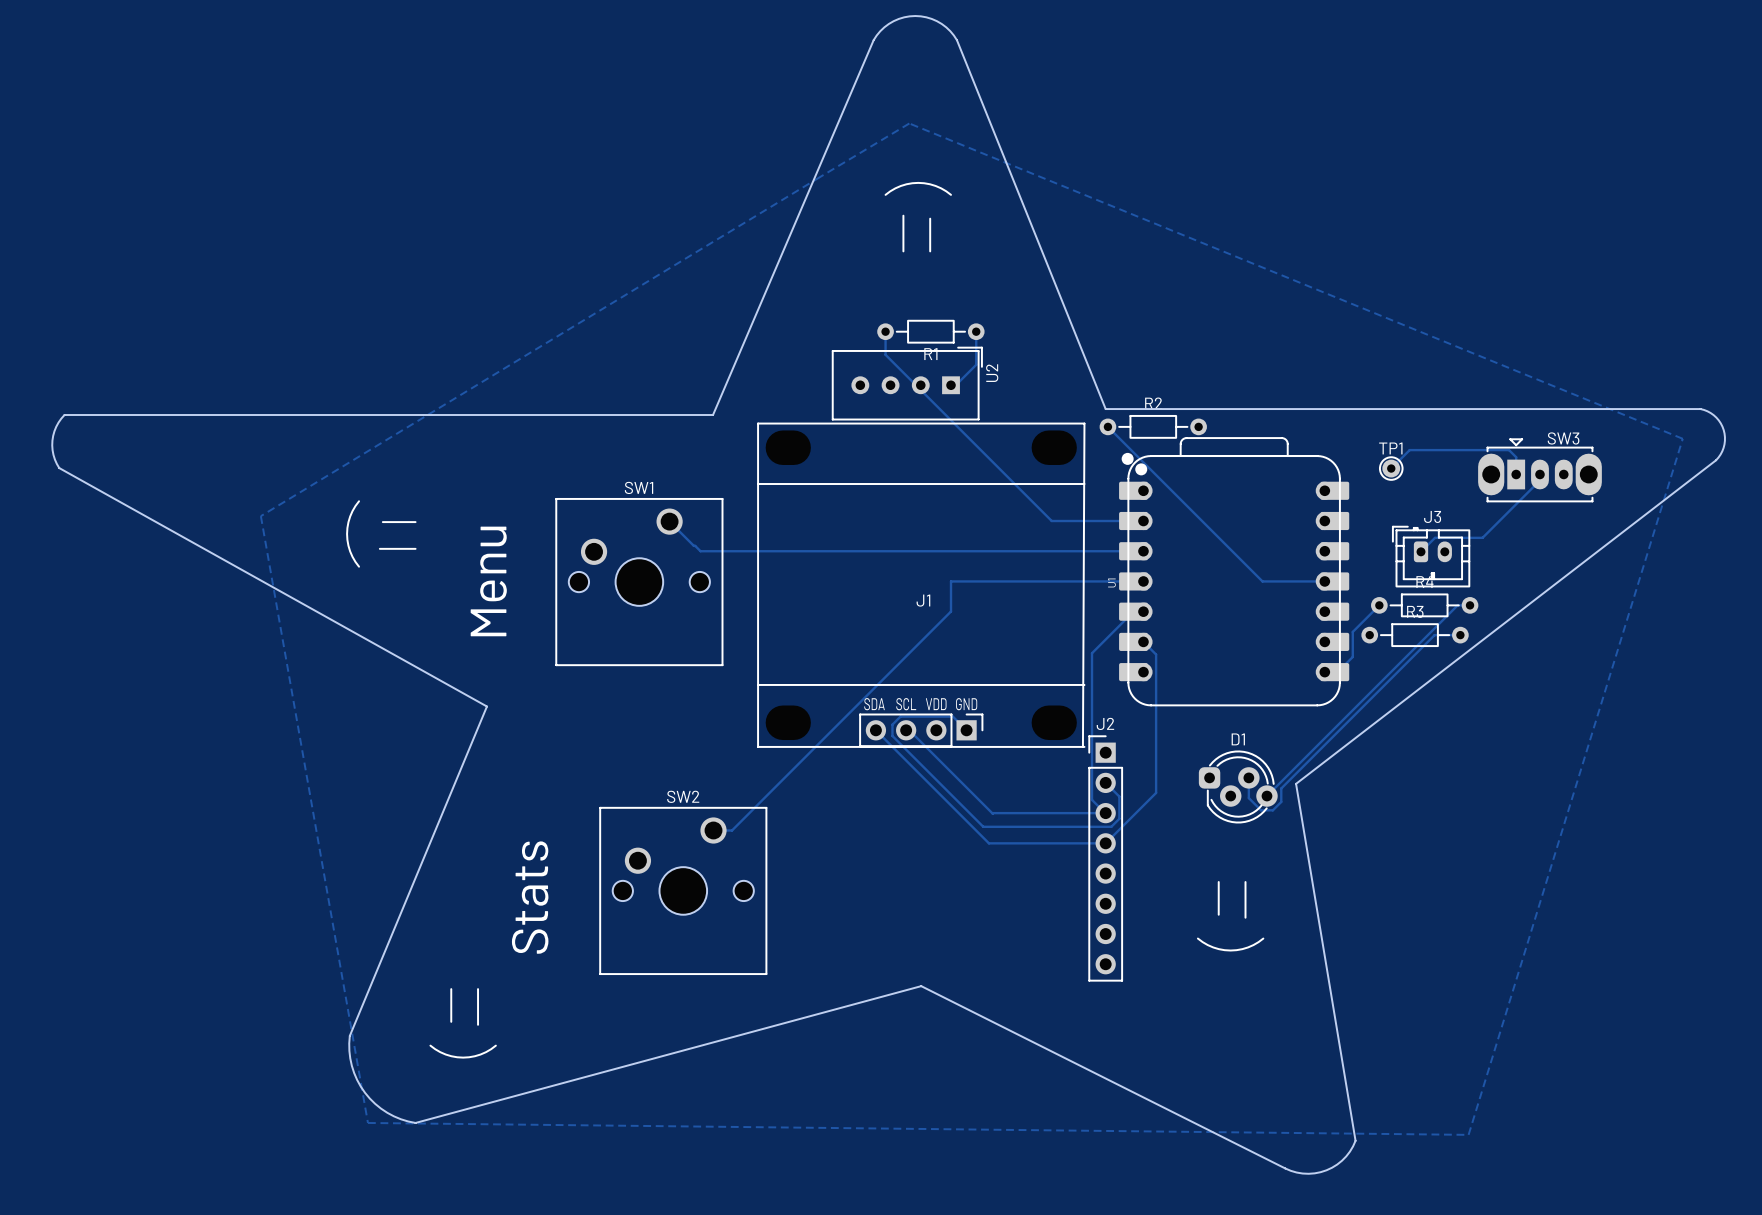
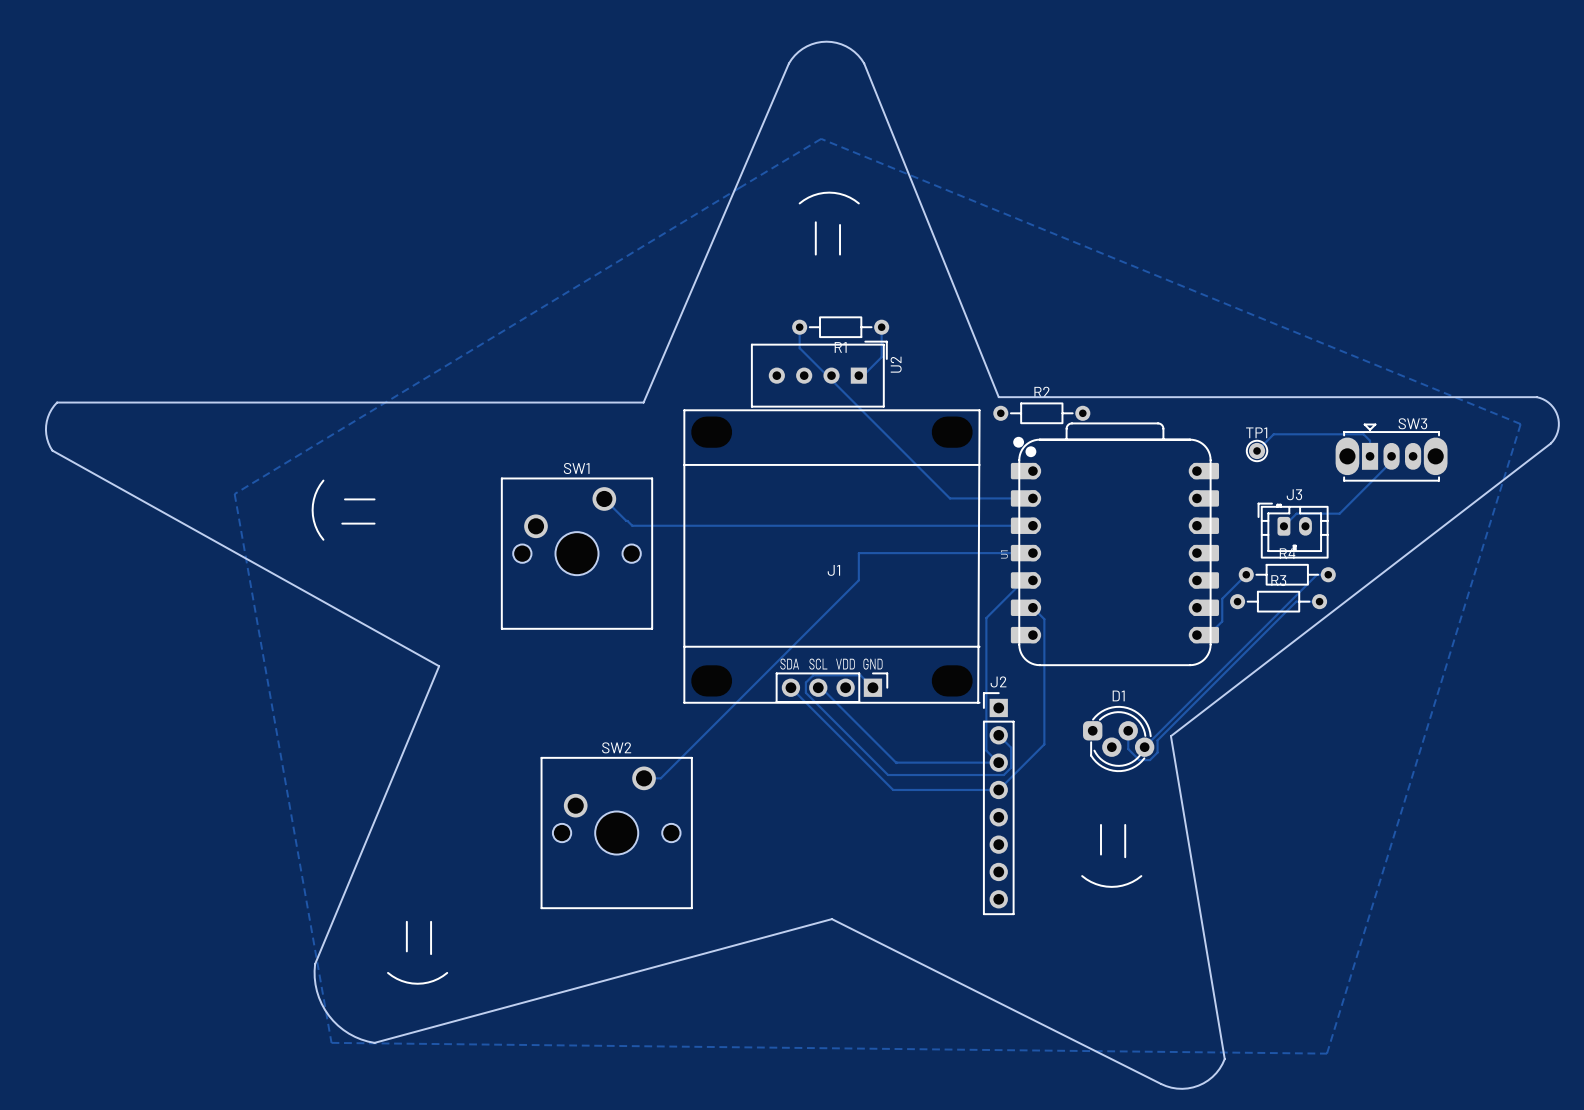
track: (1107, 426) (1262, 581) (1324, 581) -> none
text: Menu (488, 581) -> none
text: Stats (530, 897) -> none

